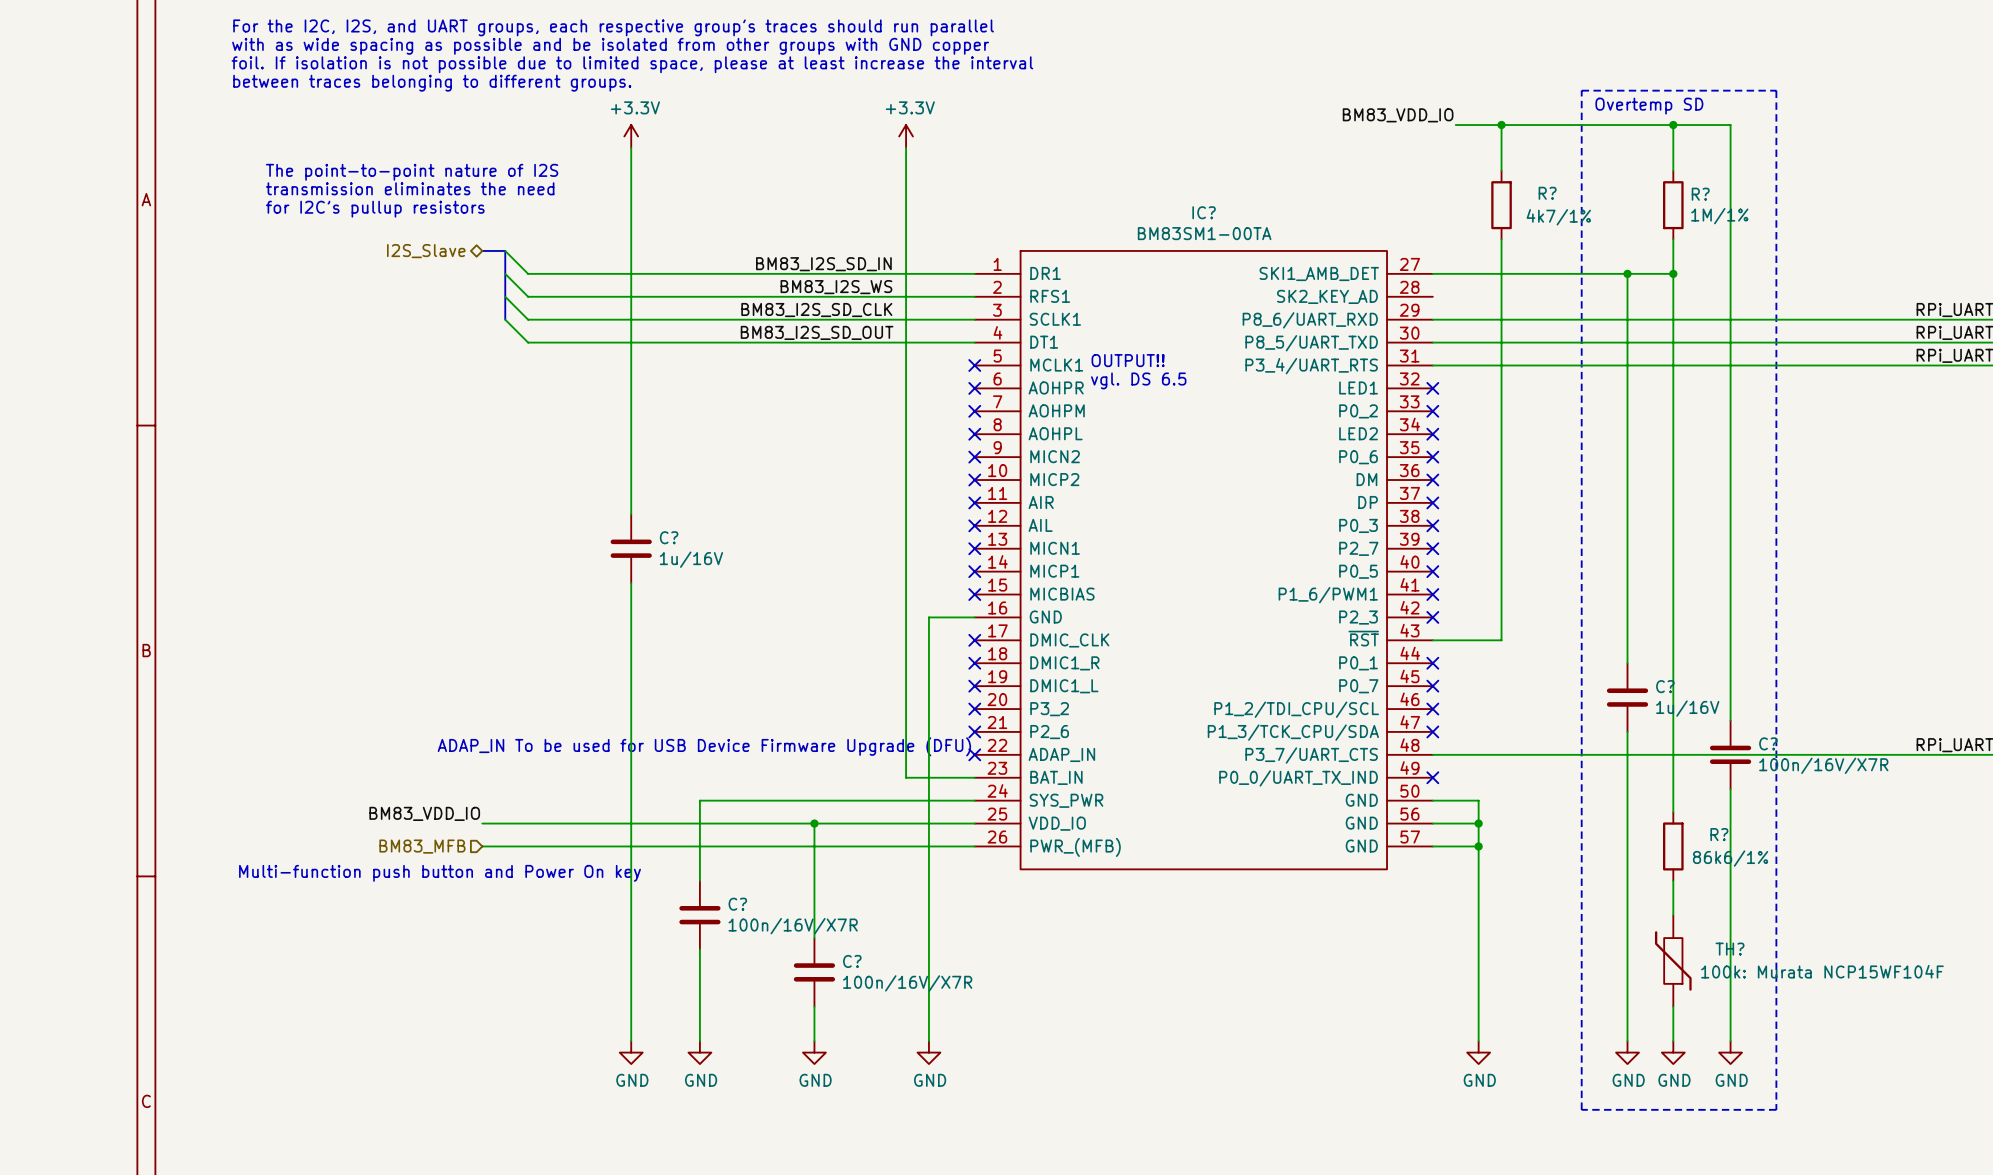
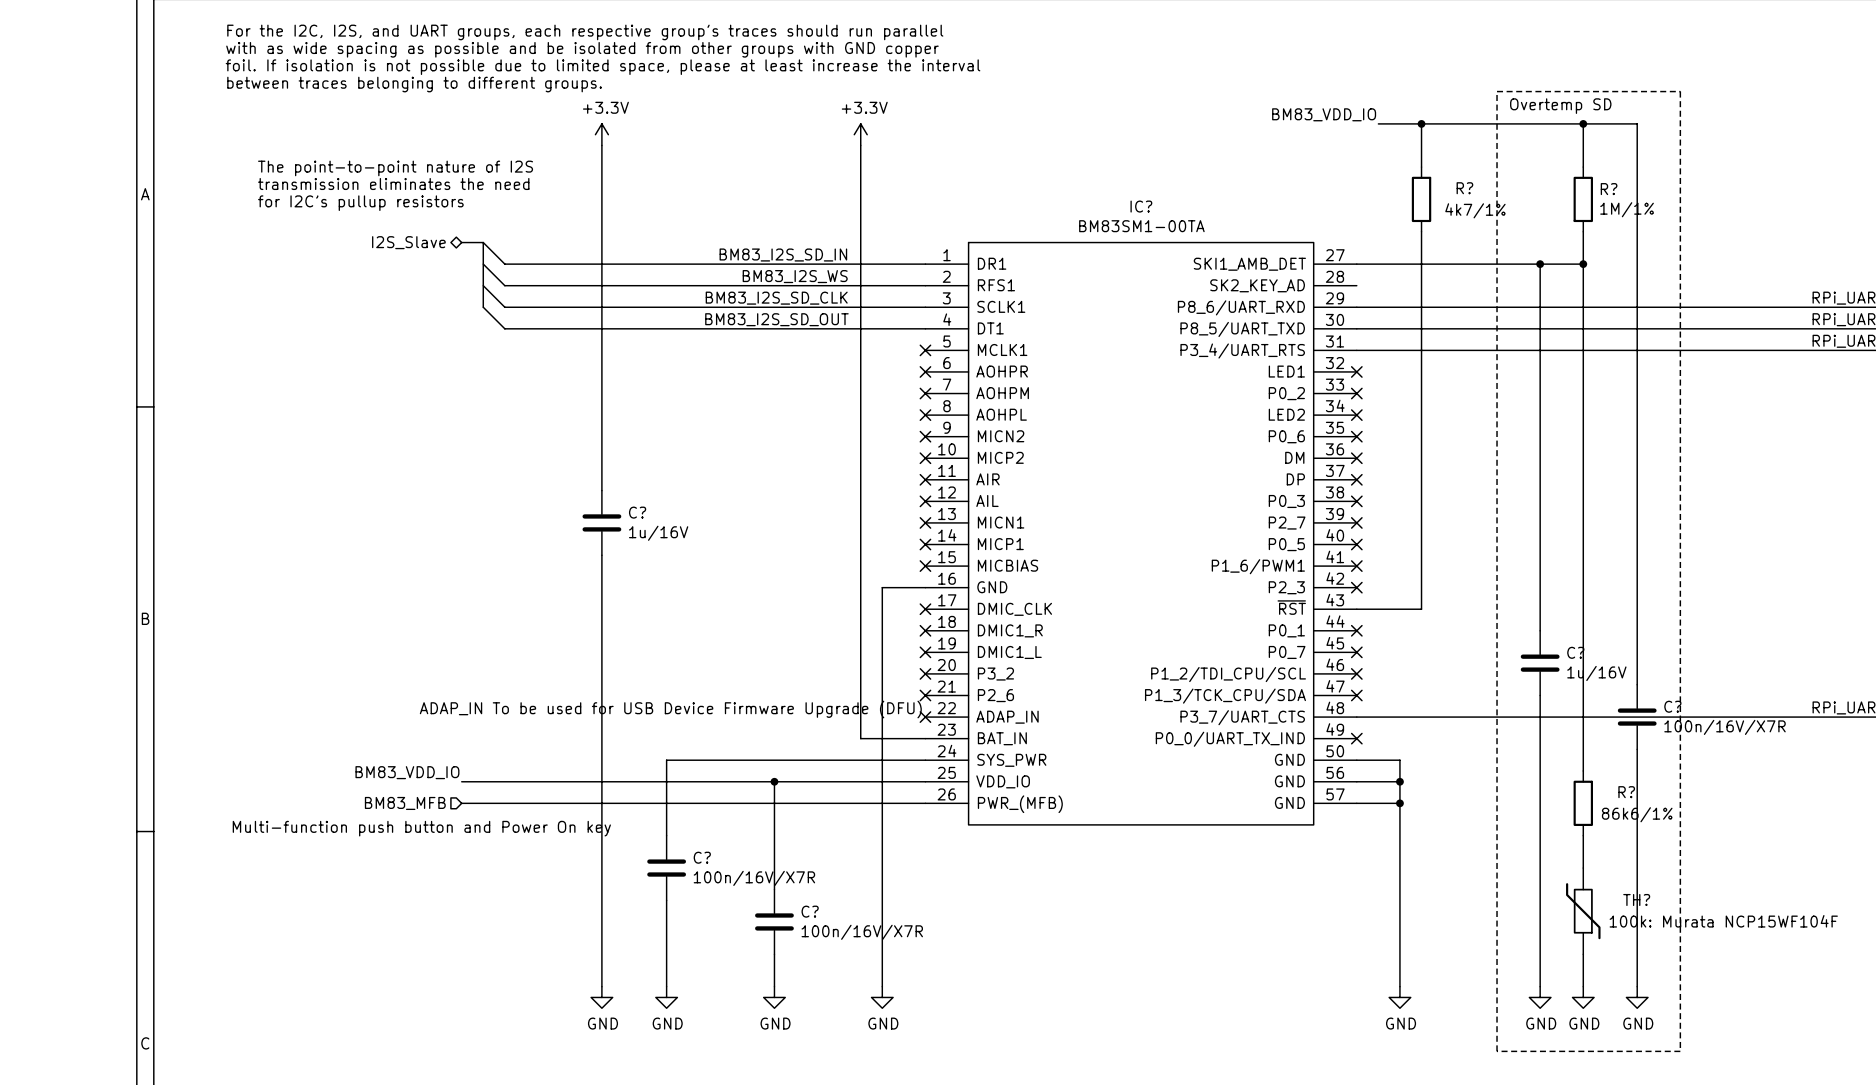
text: OUTPUT!! (1128, 360) -> none
text: vgl. DS 6.5 (1138, 380) -> none

